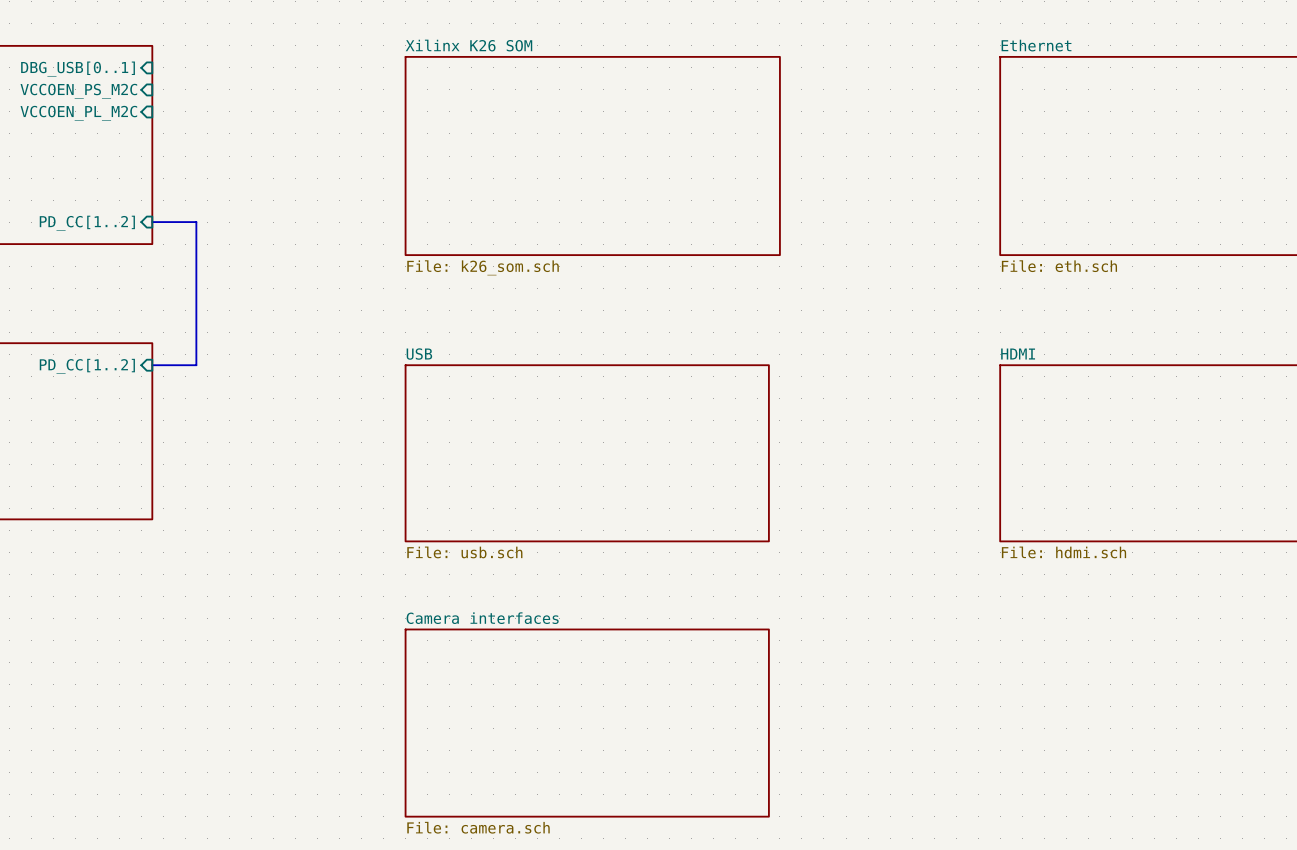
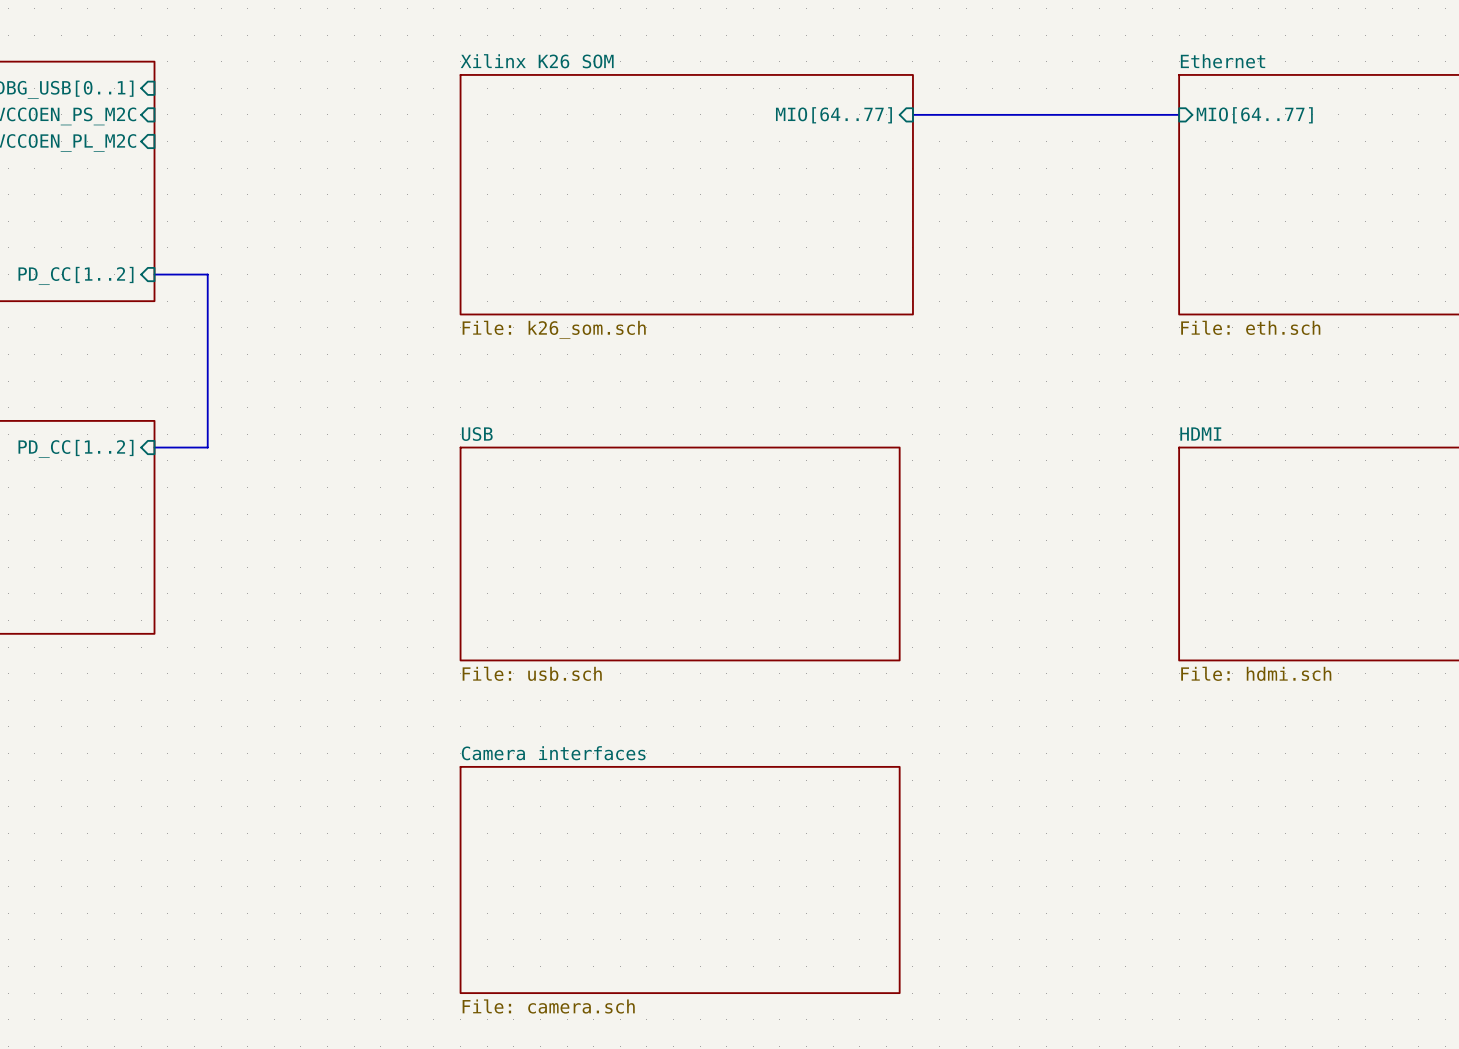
bus: none -> (912, 114) (1179, 114)
sheet pin: none -> MIO[64..77] (833, 115)
sheet pin: none -> MIO[64..77] (1254, 115)

